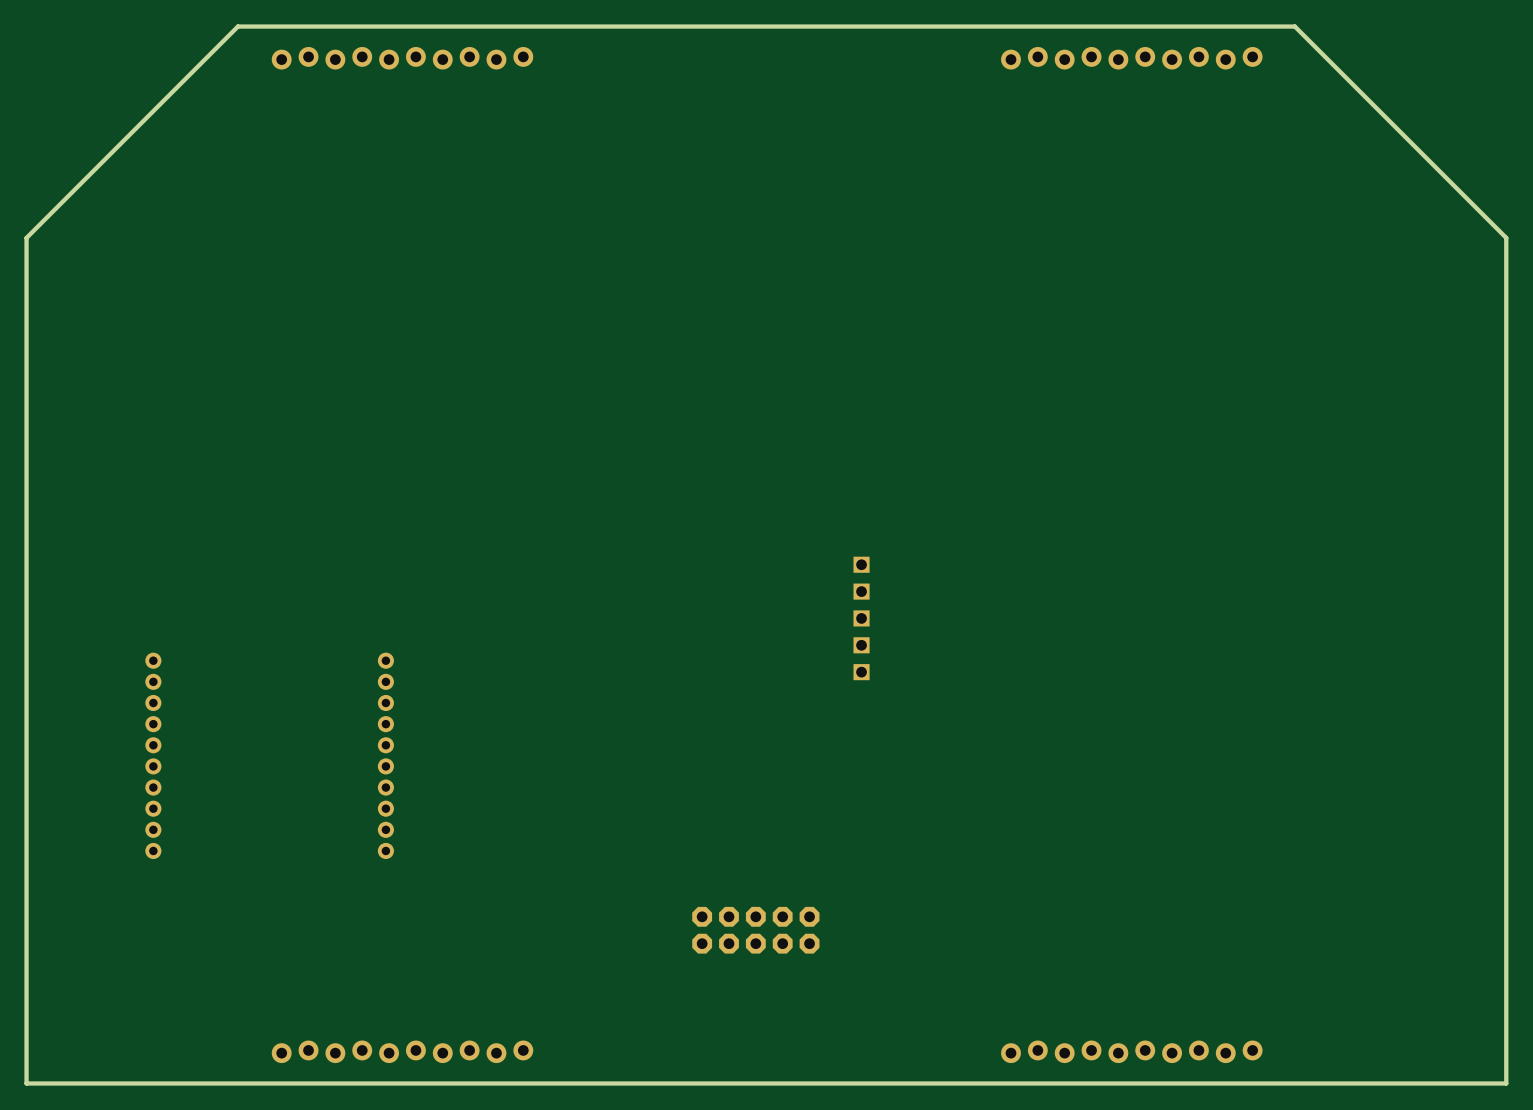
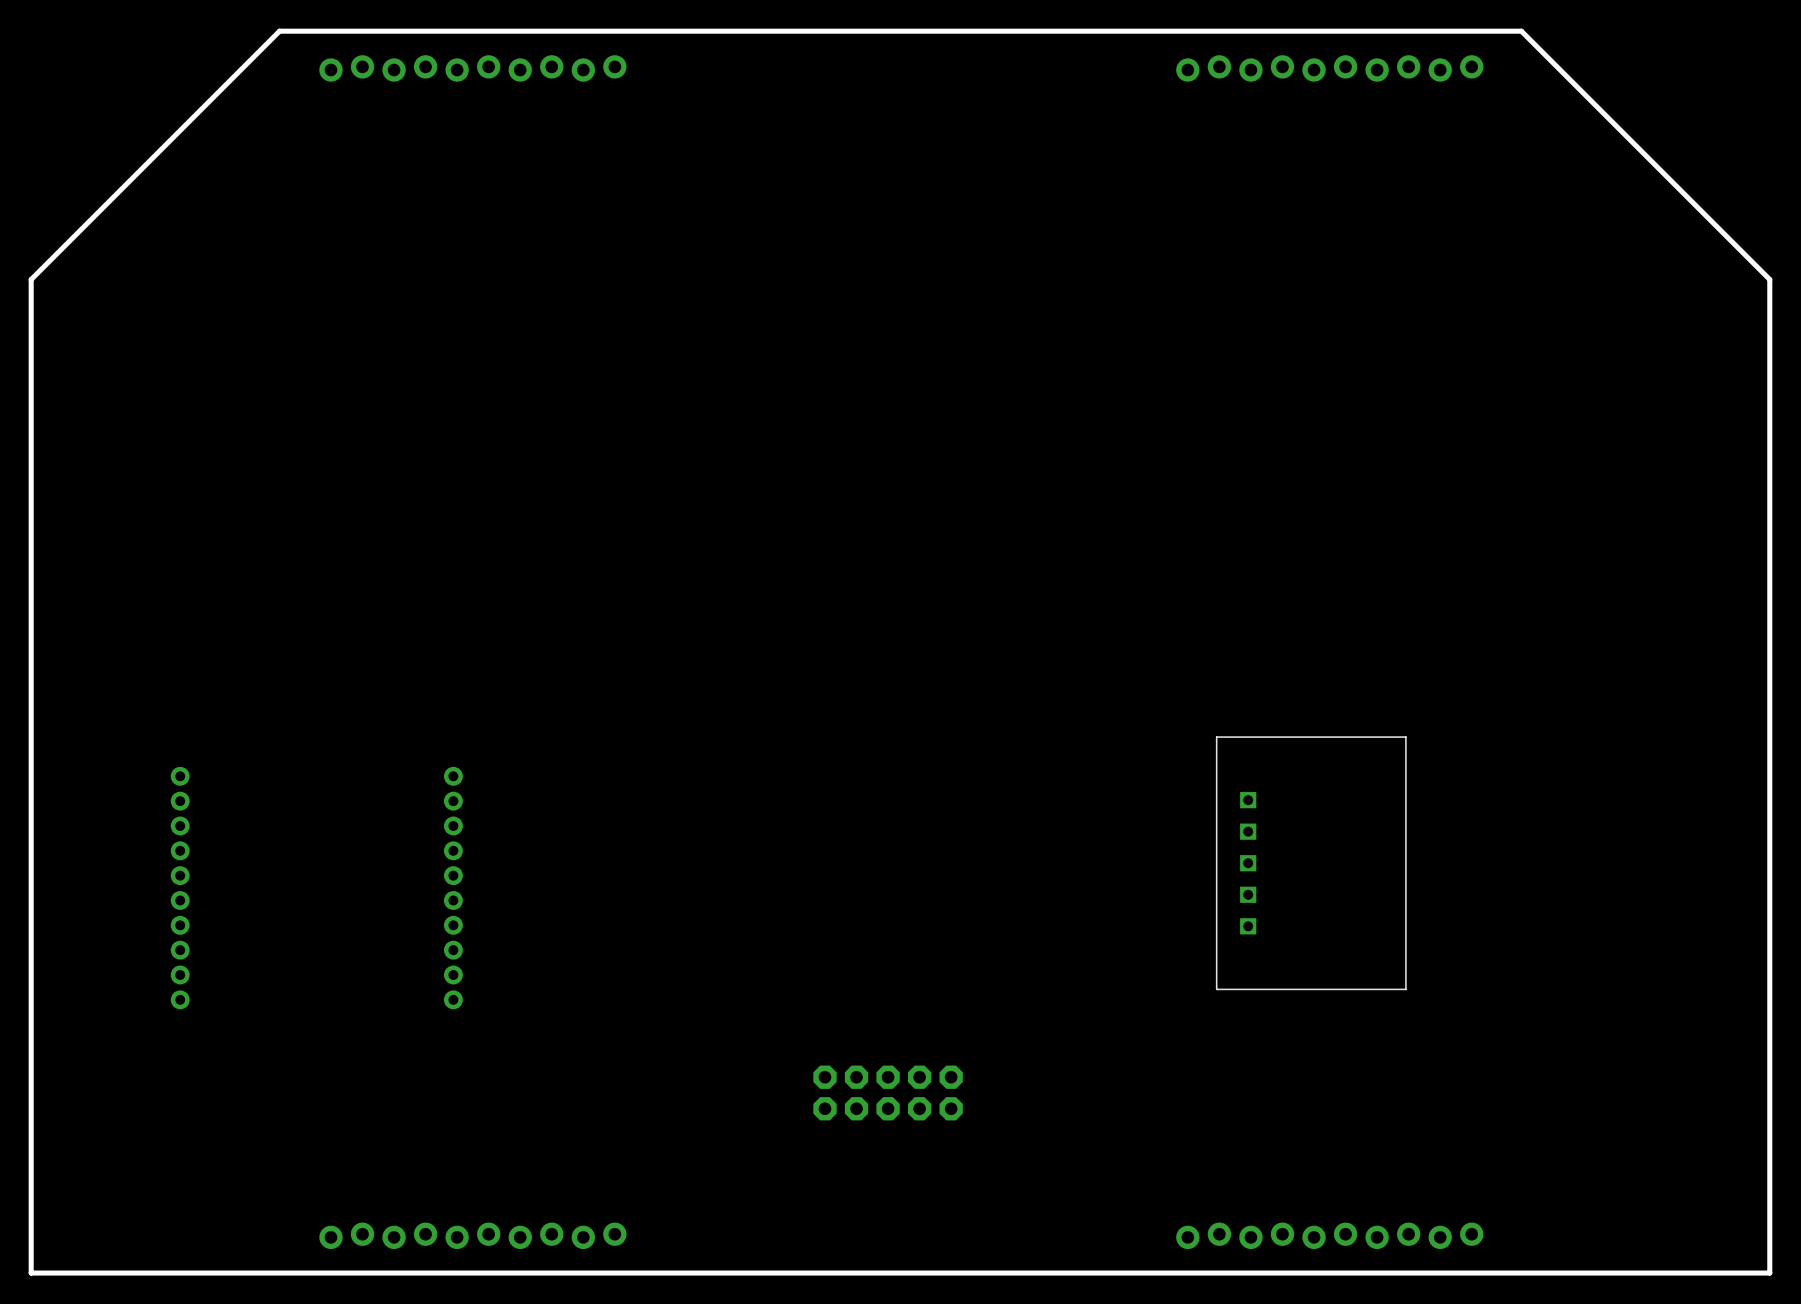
part: (861, 618) -> none
part: none -> (1311, 863)

